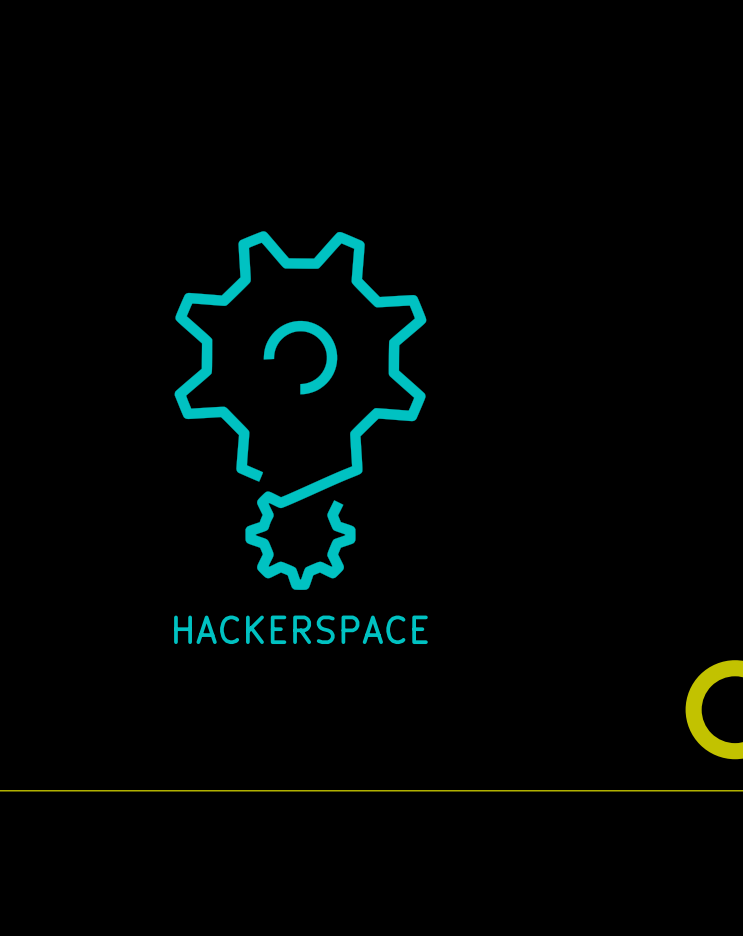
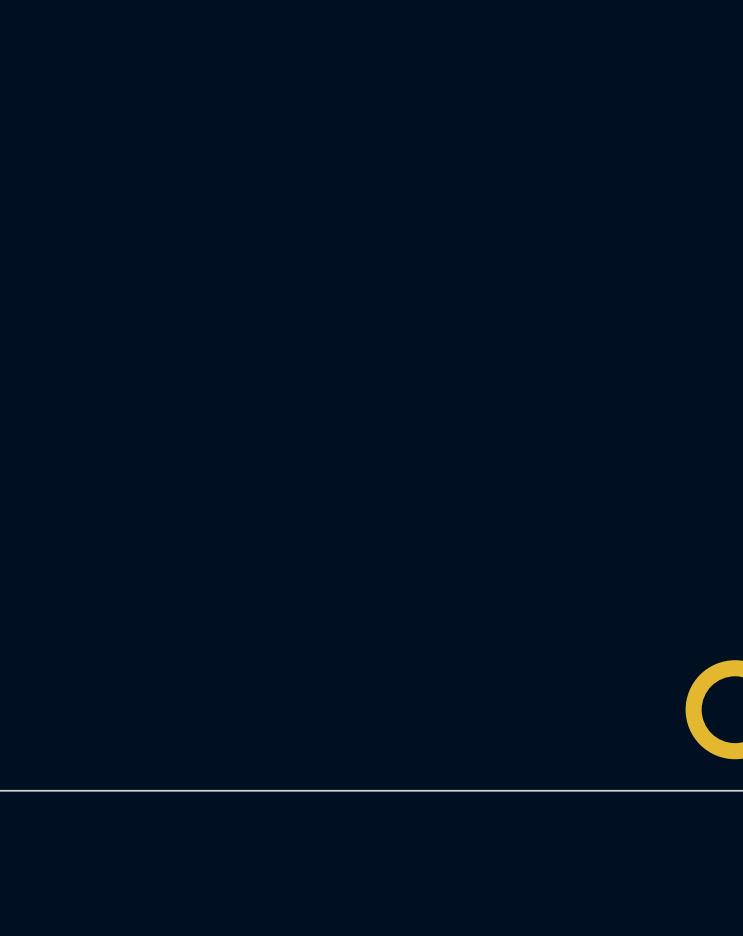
drawing: [174, 231, 427, 590] -> none
text: HACKERSPACE (300, 629) -> none

